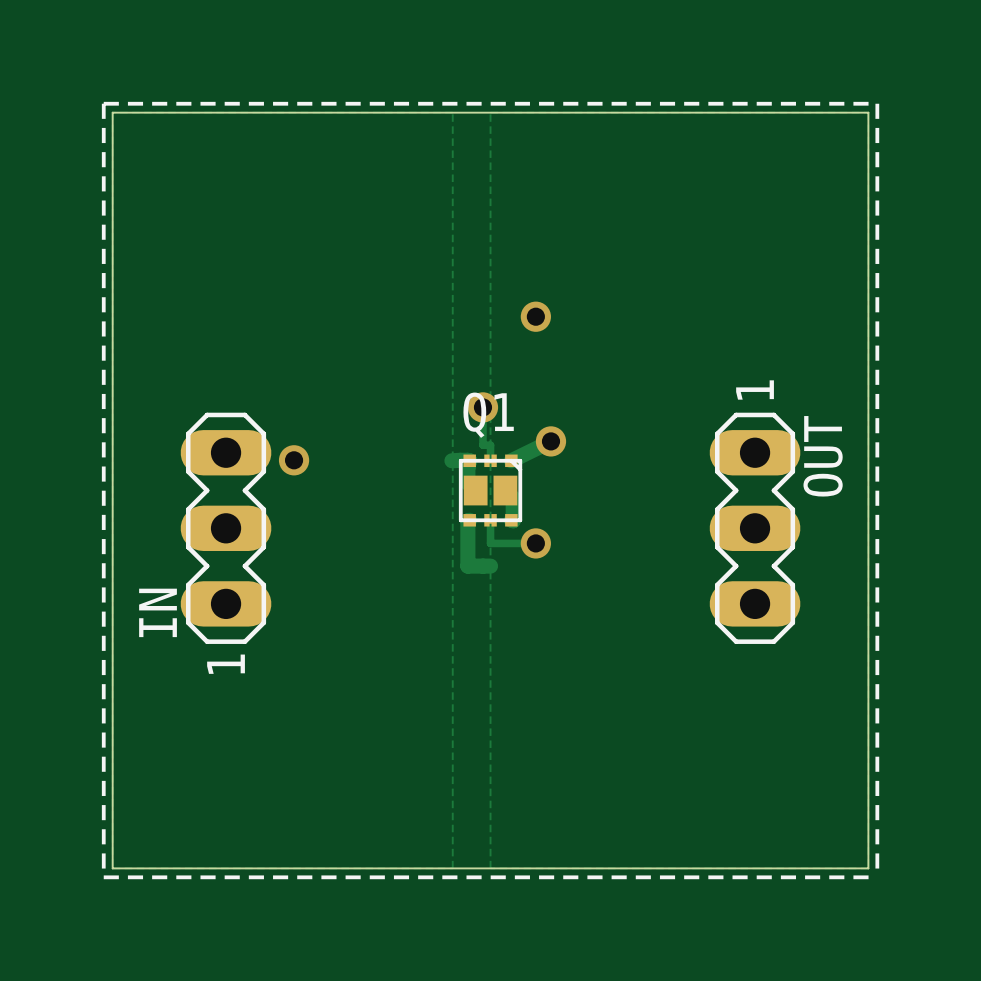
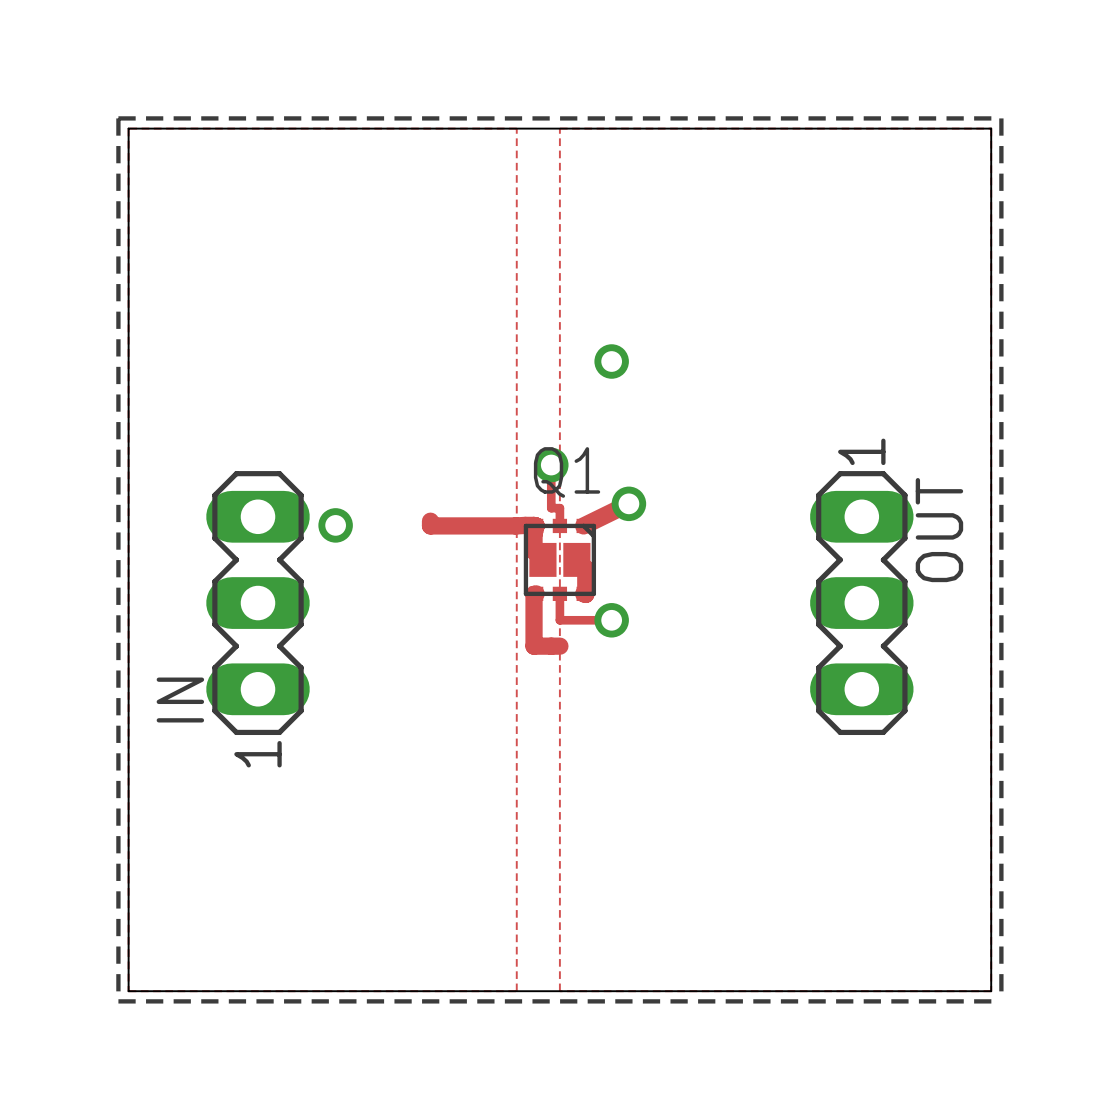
track: none -> (430, 521) (430, 525) (515, 525)

